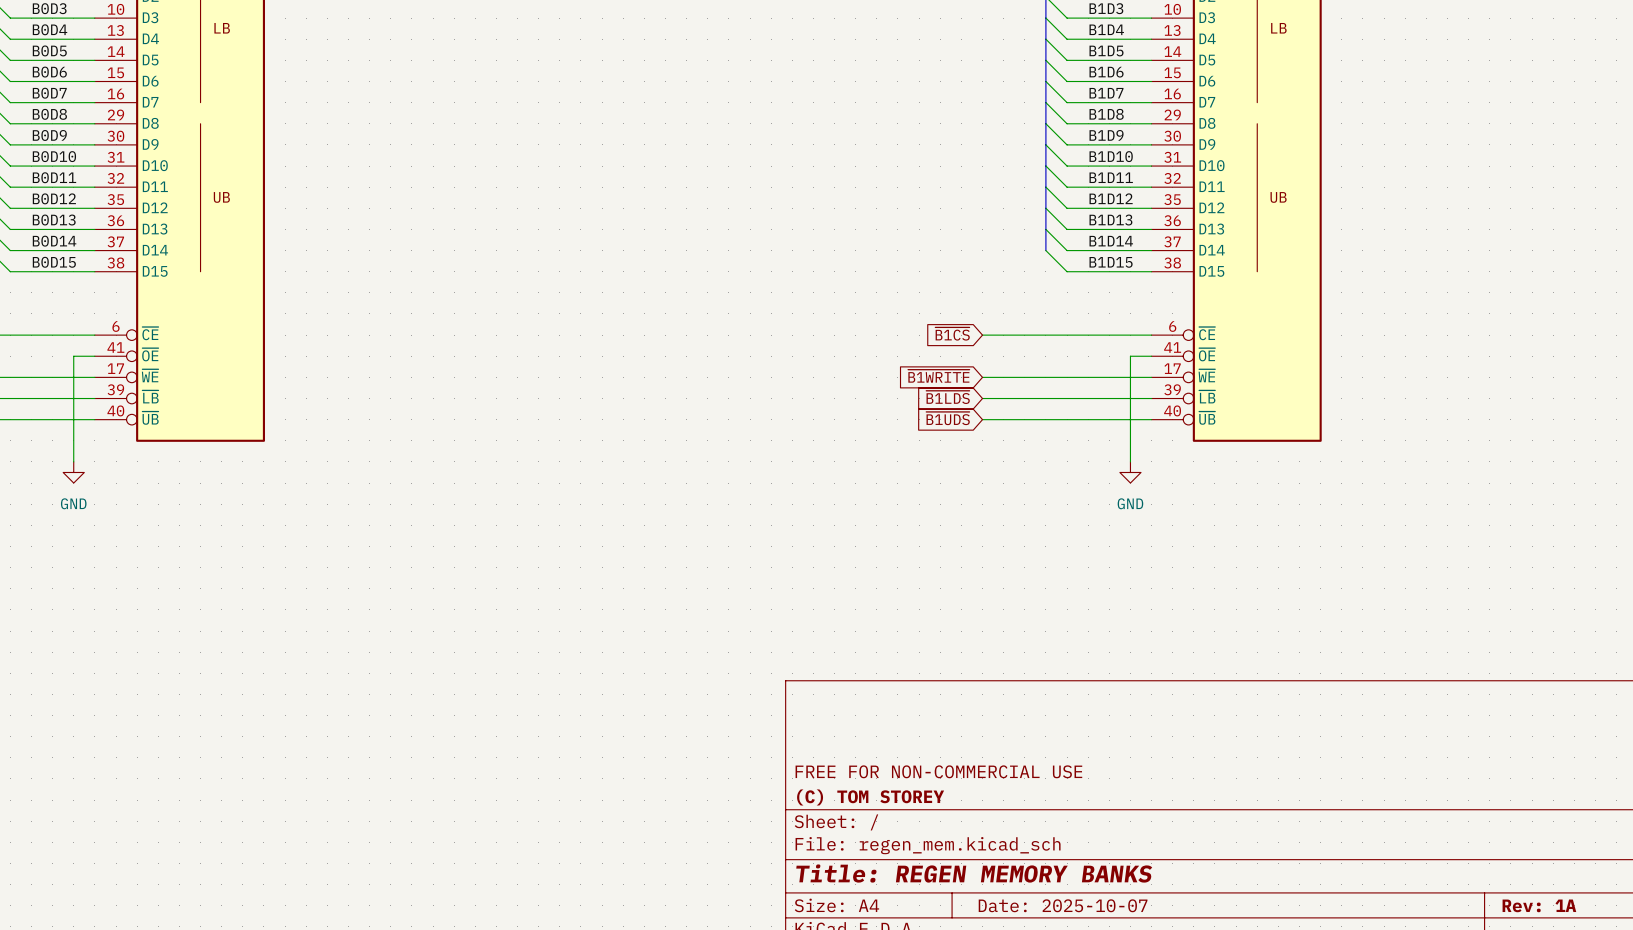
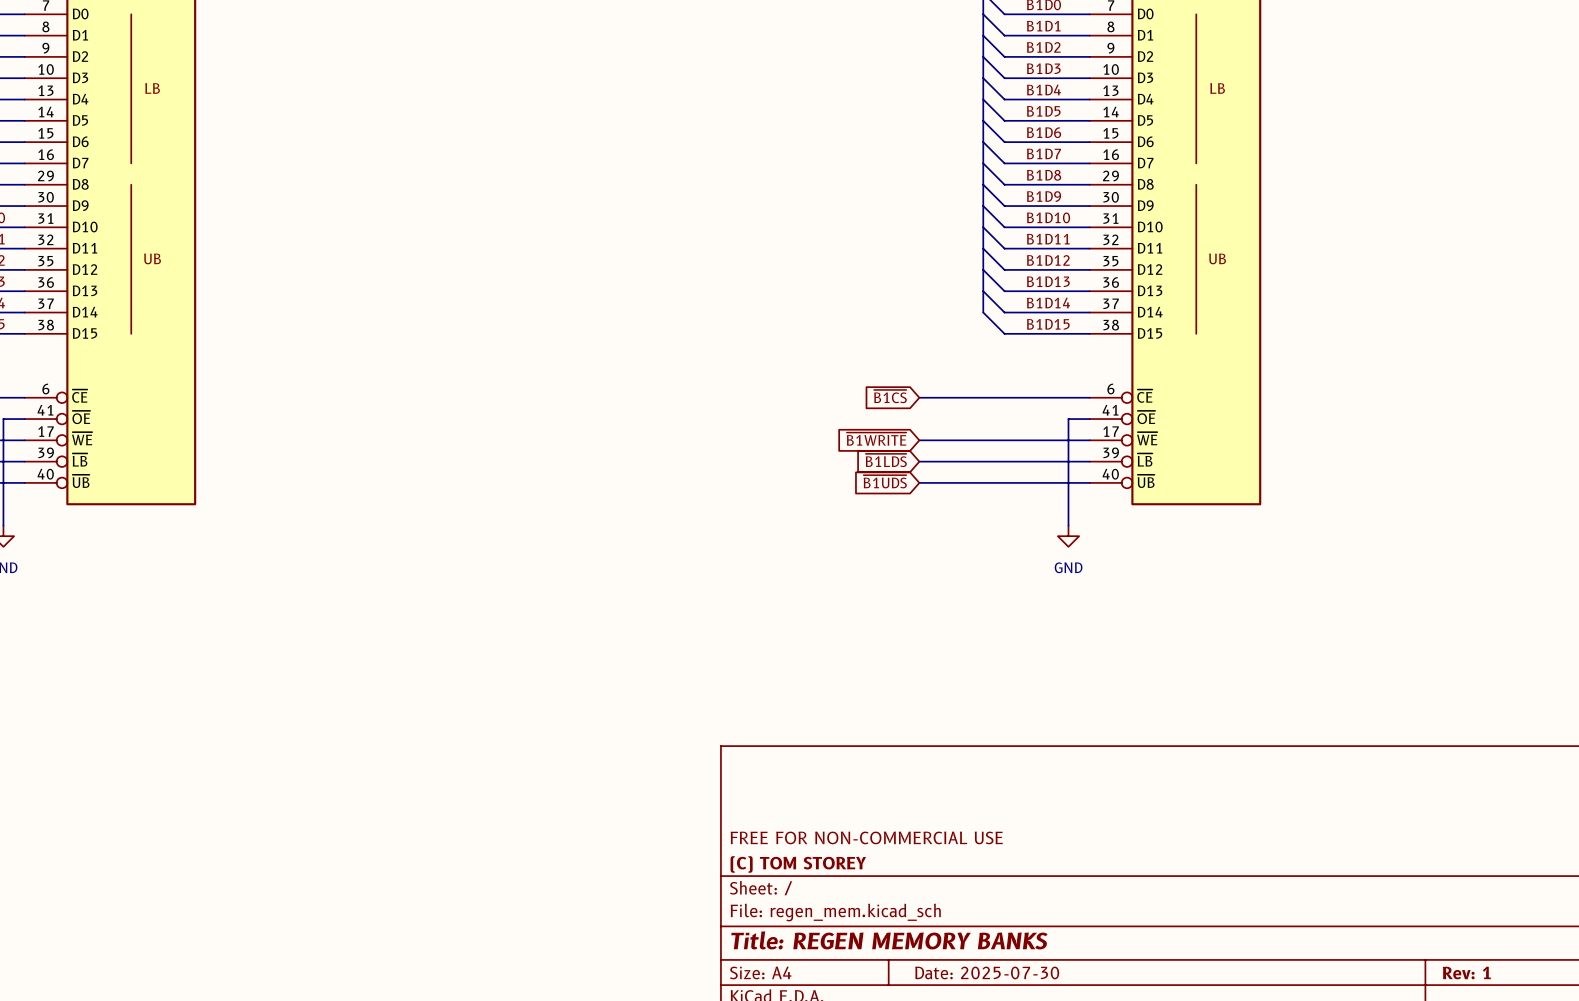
title block: Date: 2025-10-07 (1063, 905) -> Date: 2025-07-30 (987, 972)
title block: Rev: 1A (1539, 905) -> Rev: 1 (1466, 972)

